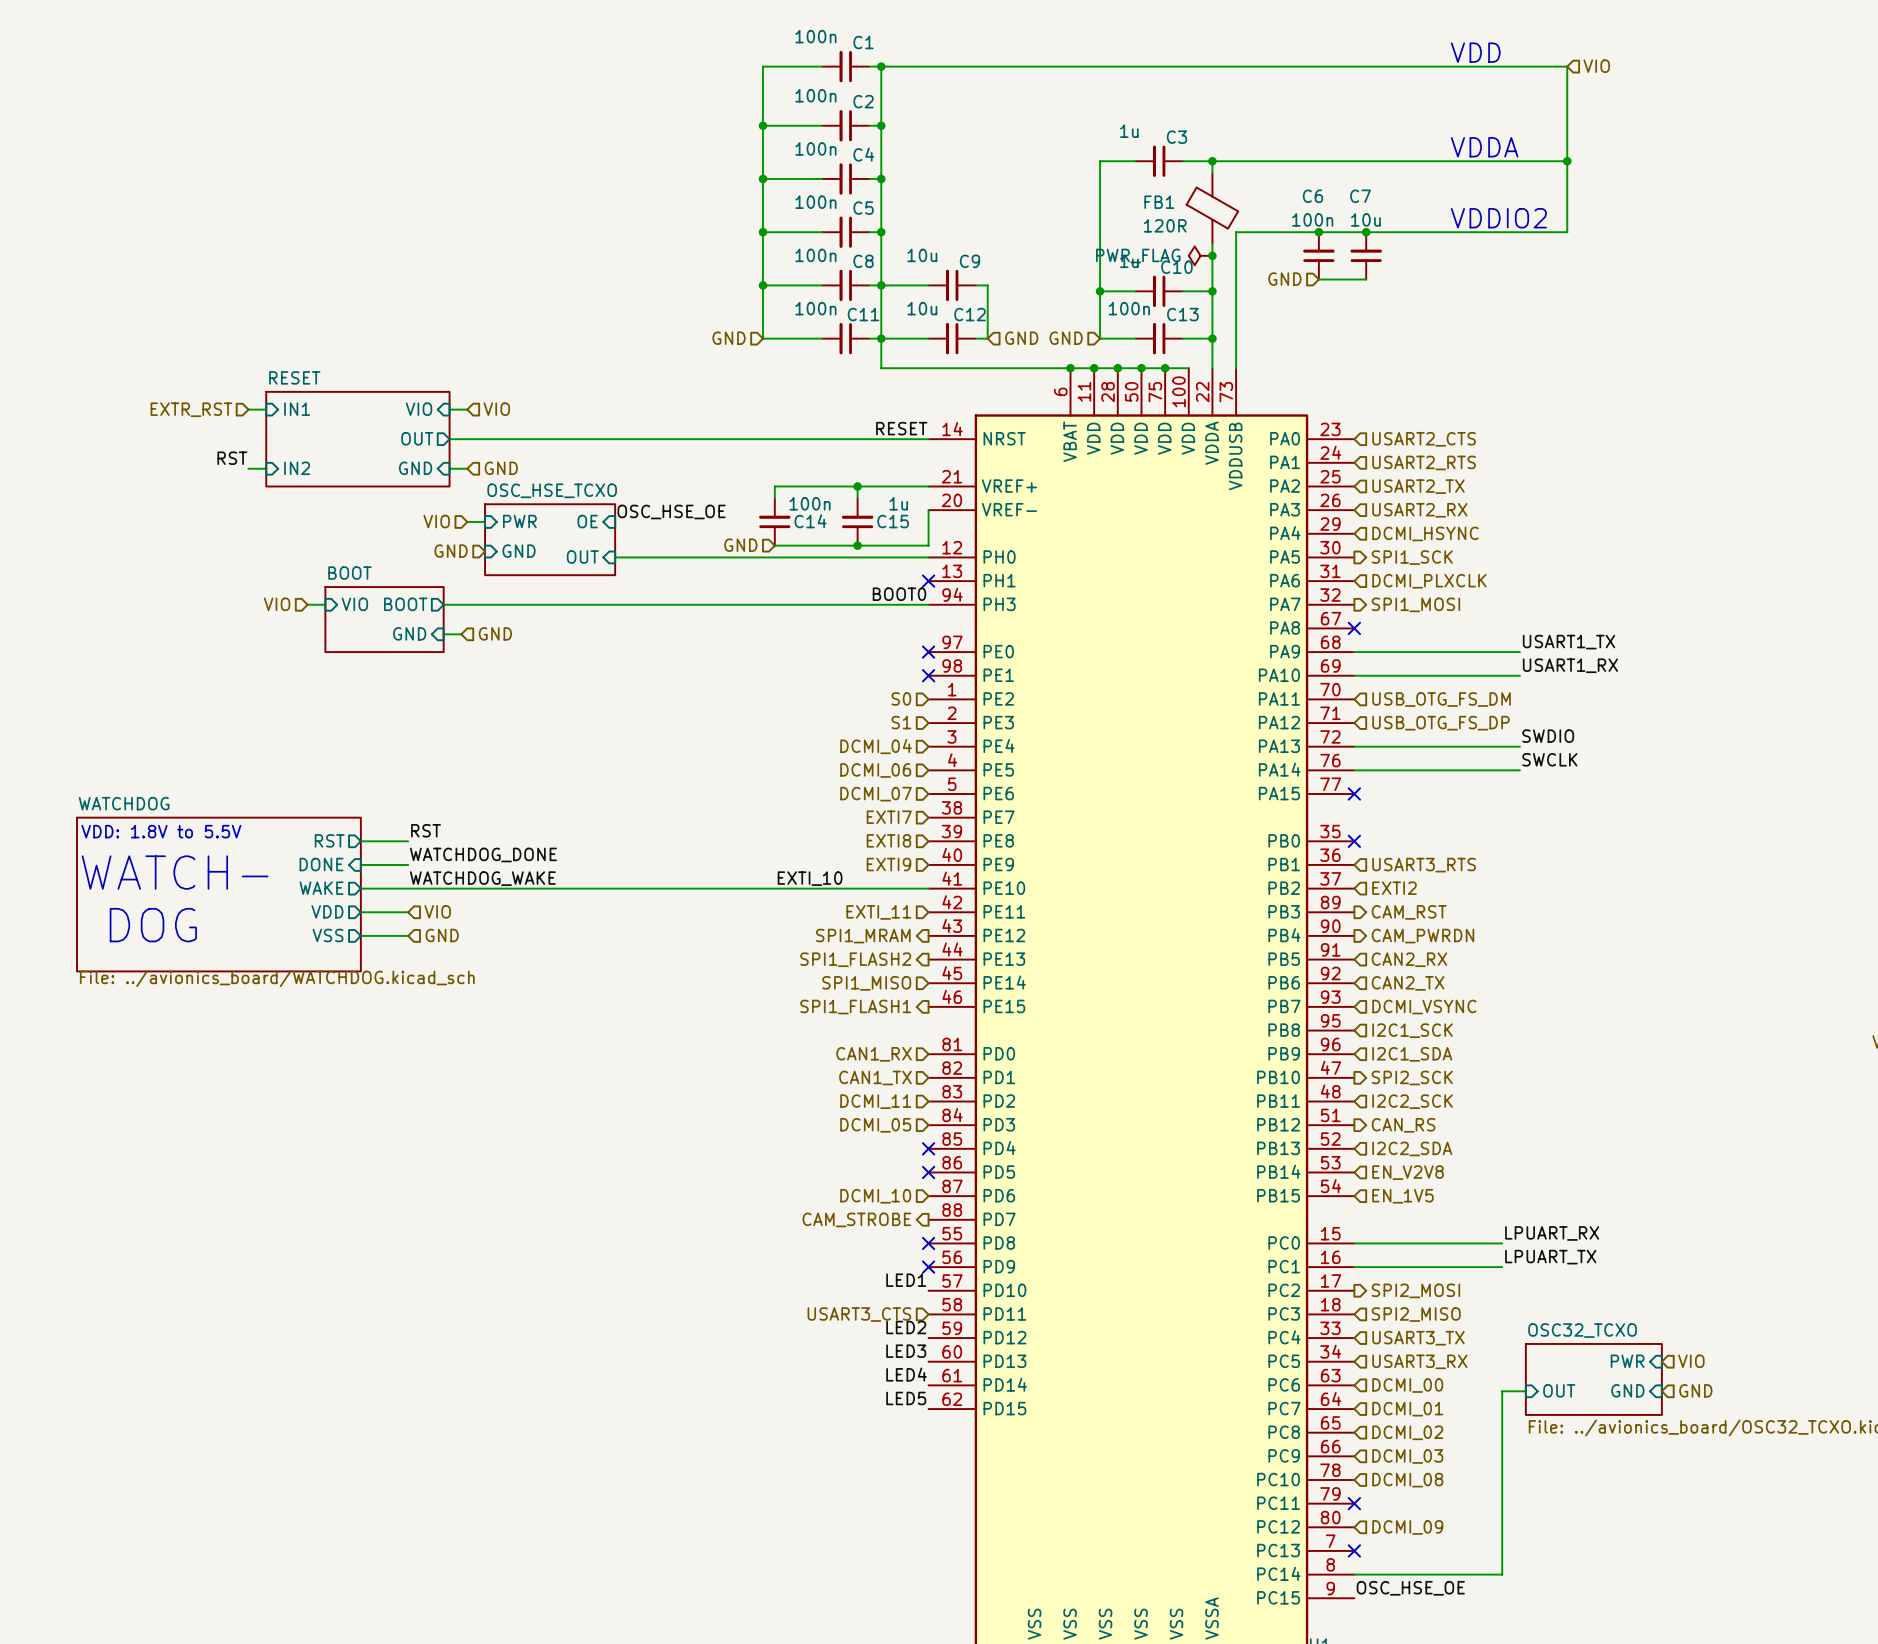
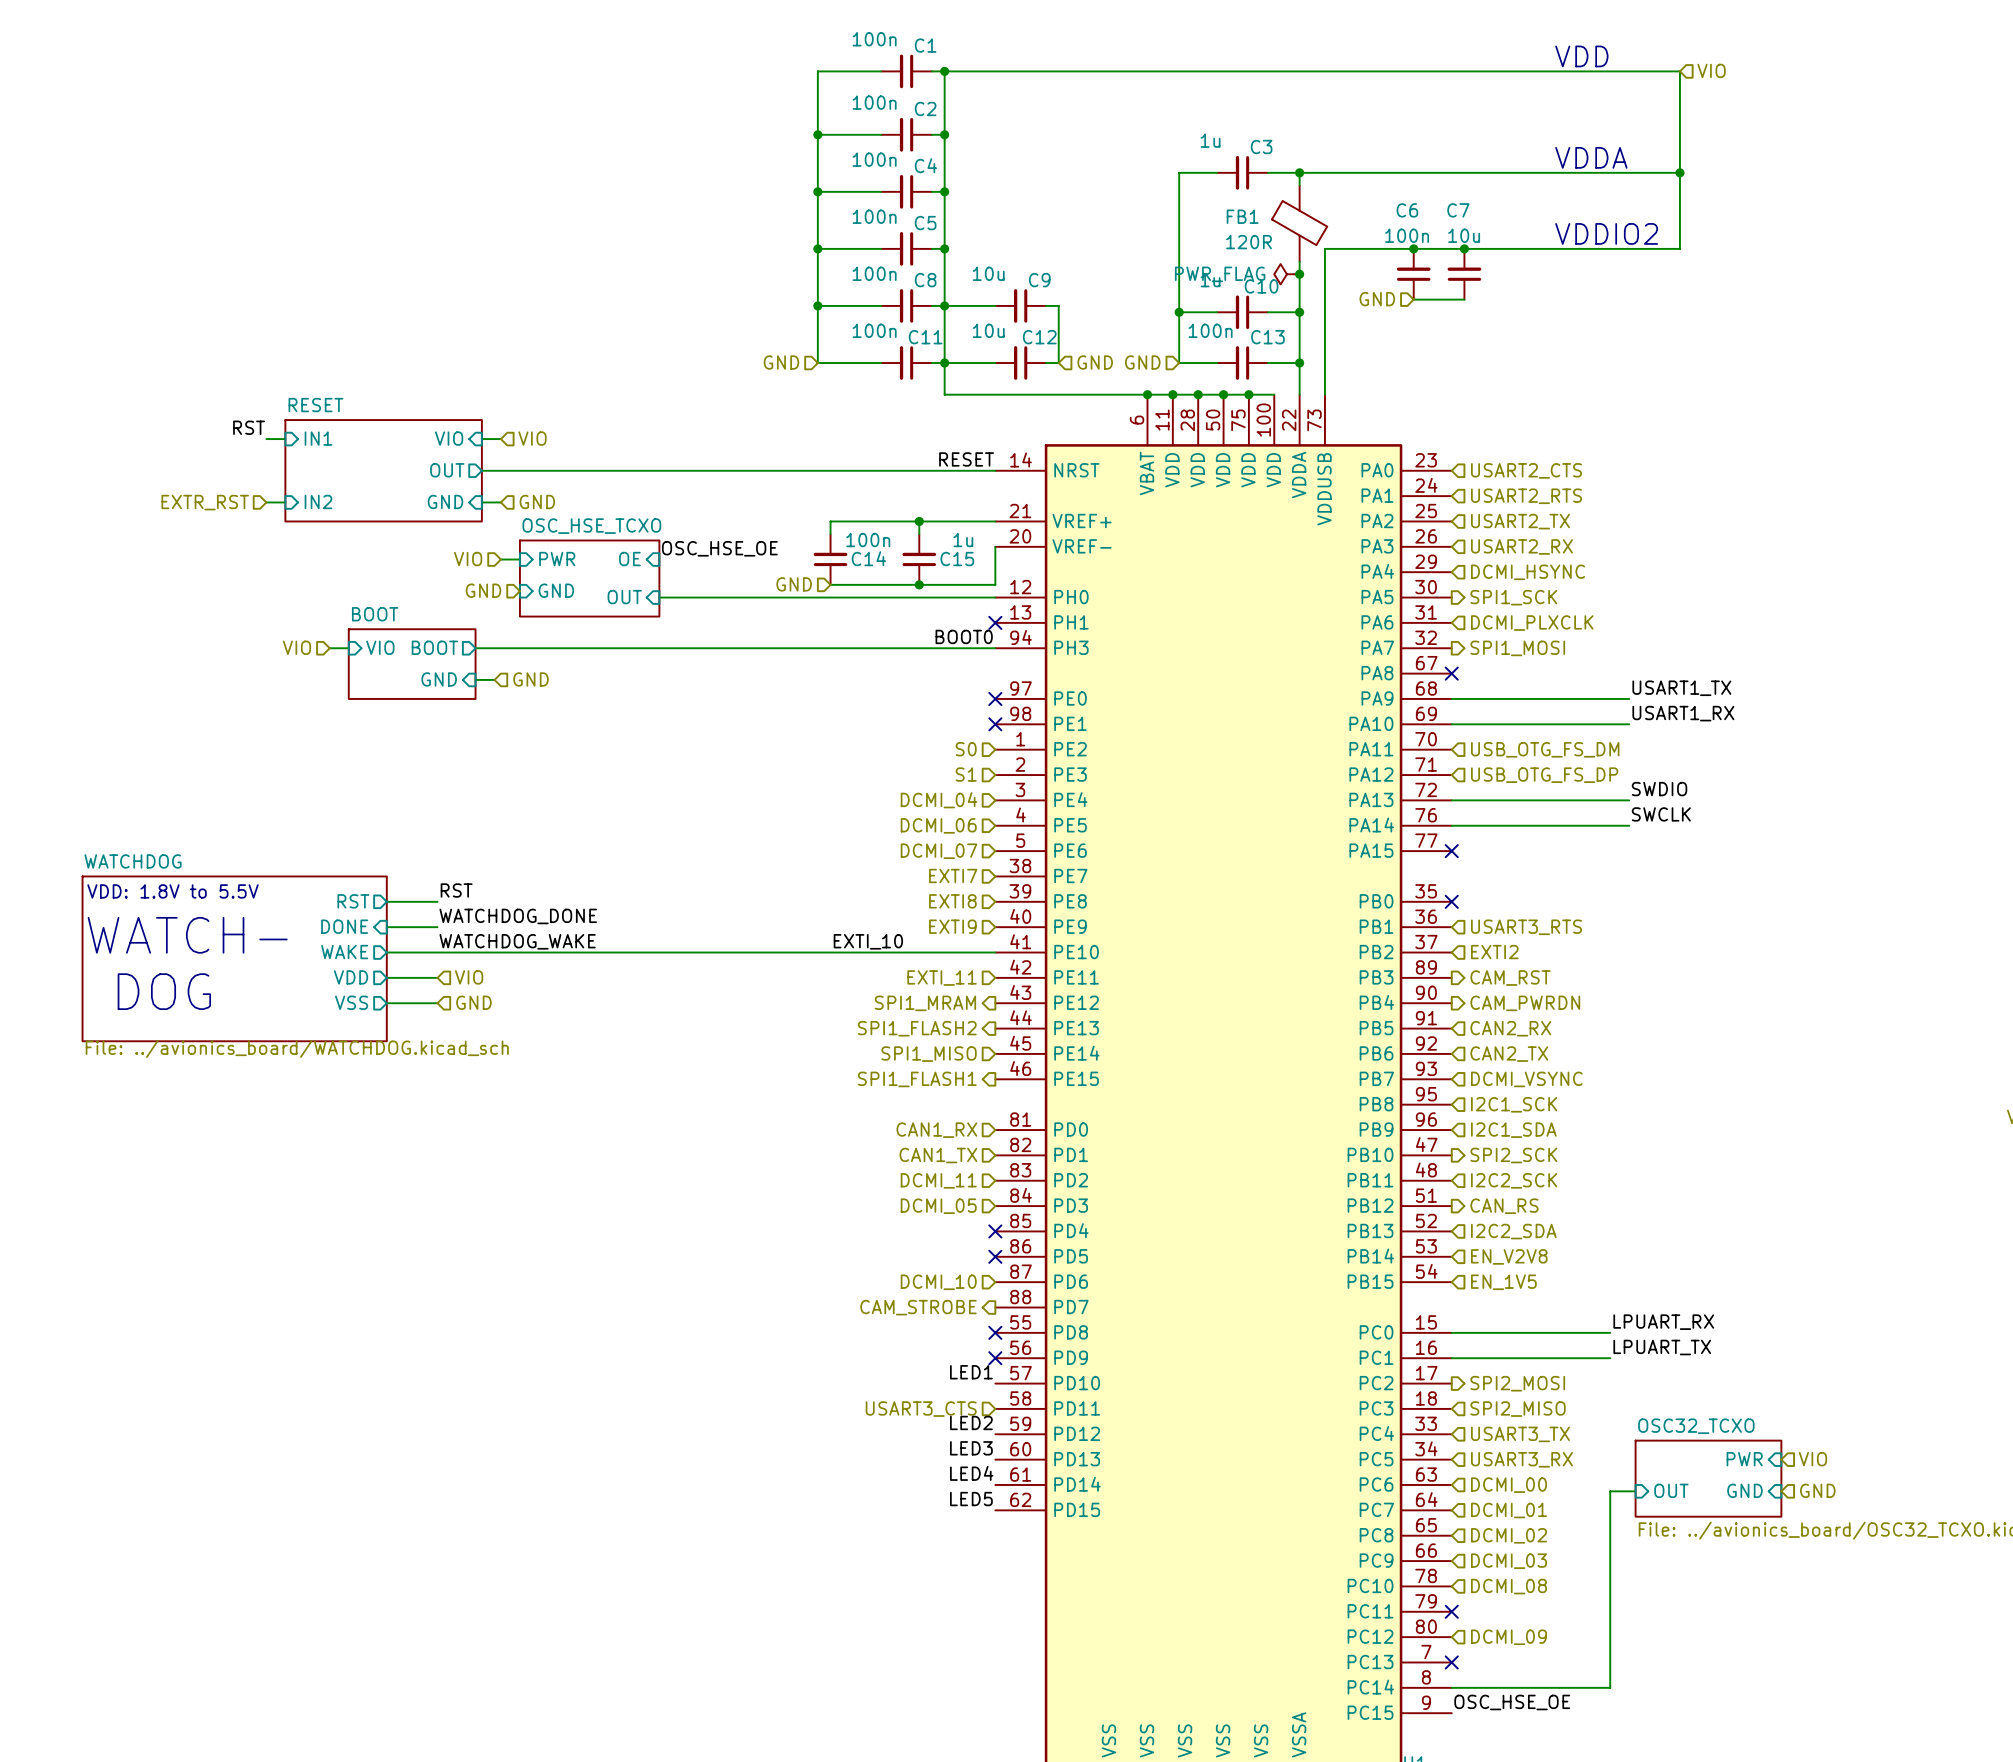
hierarchical label position: EXTR_RST (191, 409) -> EXTR_RST (205, 502)
label position: RST (232, 458) -> RST (249, 427)

